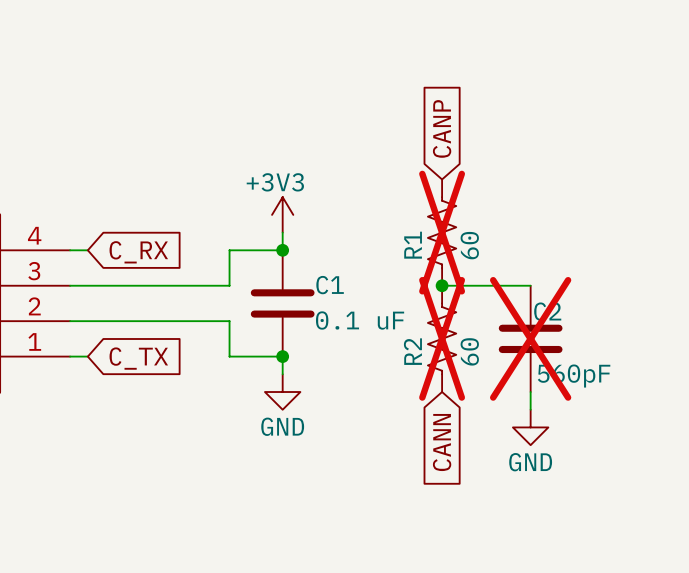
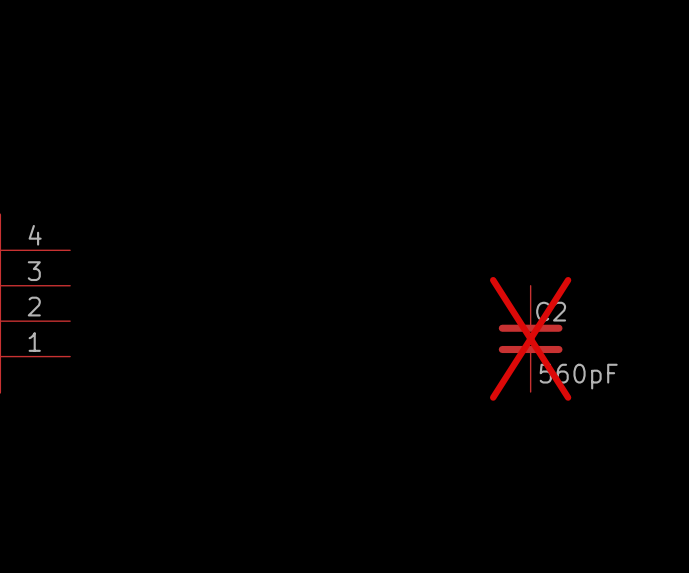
global label: CANP (442, 128) -> none
power symbol: +3V3 (282, 214) -> none
wire: (282, 232) (282, 250) (229, 250) (229, 285) (70, 285) -> none
R1: 60 (442, 232) -> none
wire: (70, 250) (87, 250) -> none
junction: (282, 250) -> none
global label: C_RX (138, 252) -> none
wire: (442, 285) (530, 285) -> none
junction: (442, 285) -> none
C1: 0.1 uF (282, 303) -> none
wire: (70, 321) (229, 321) (229, 356) (282, 356) (282, 374) -> none
R2: 60 (442, 338) -> none
wire: (70, 356) (87, 356) -> none
junction: (282, 356) -> none
global label: C_TX (138, 358) -> none
power symbol: GND (282, 392) -> none
wire: (530, 392) (530, 409) -> none
power symbol: GND (530, 427) -> none
global label: CANN (442, 442) -> none

